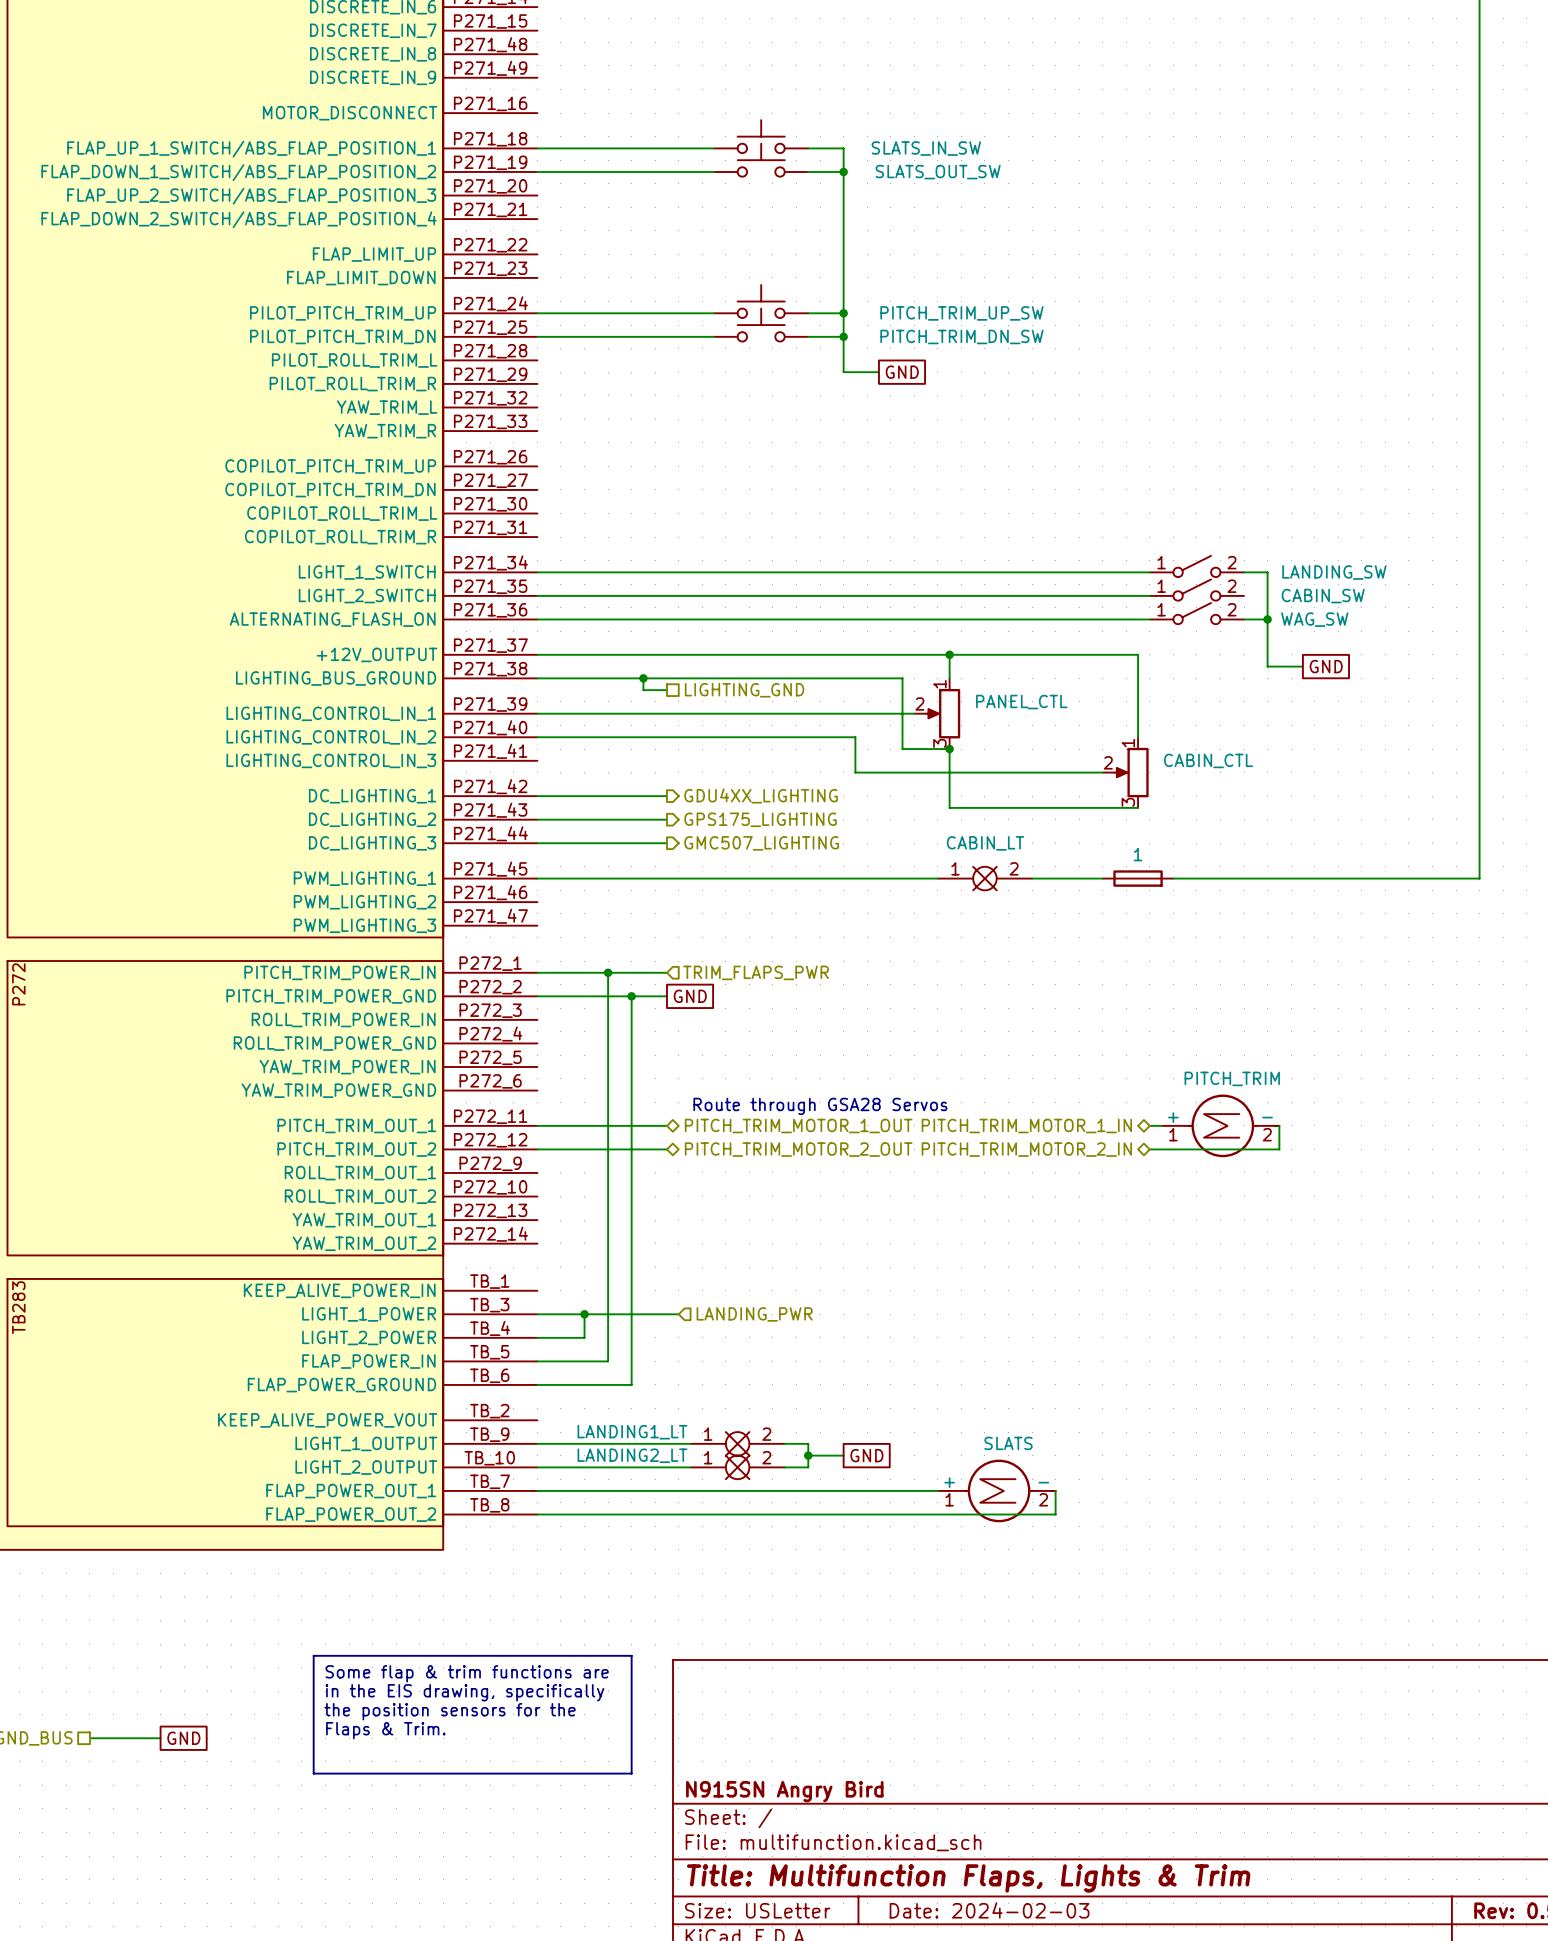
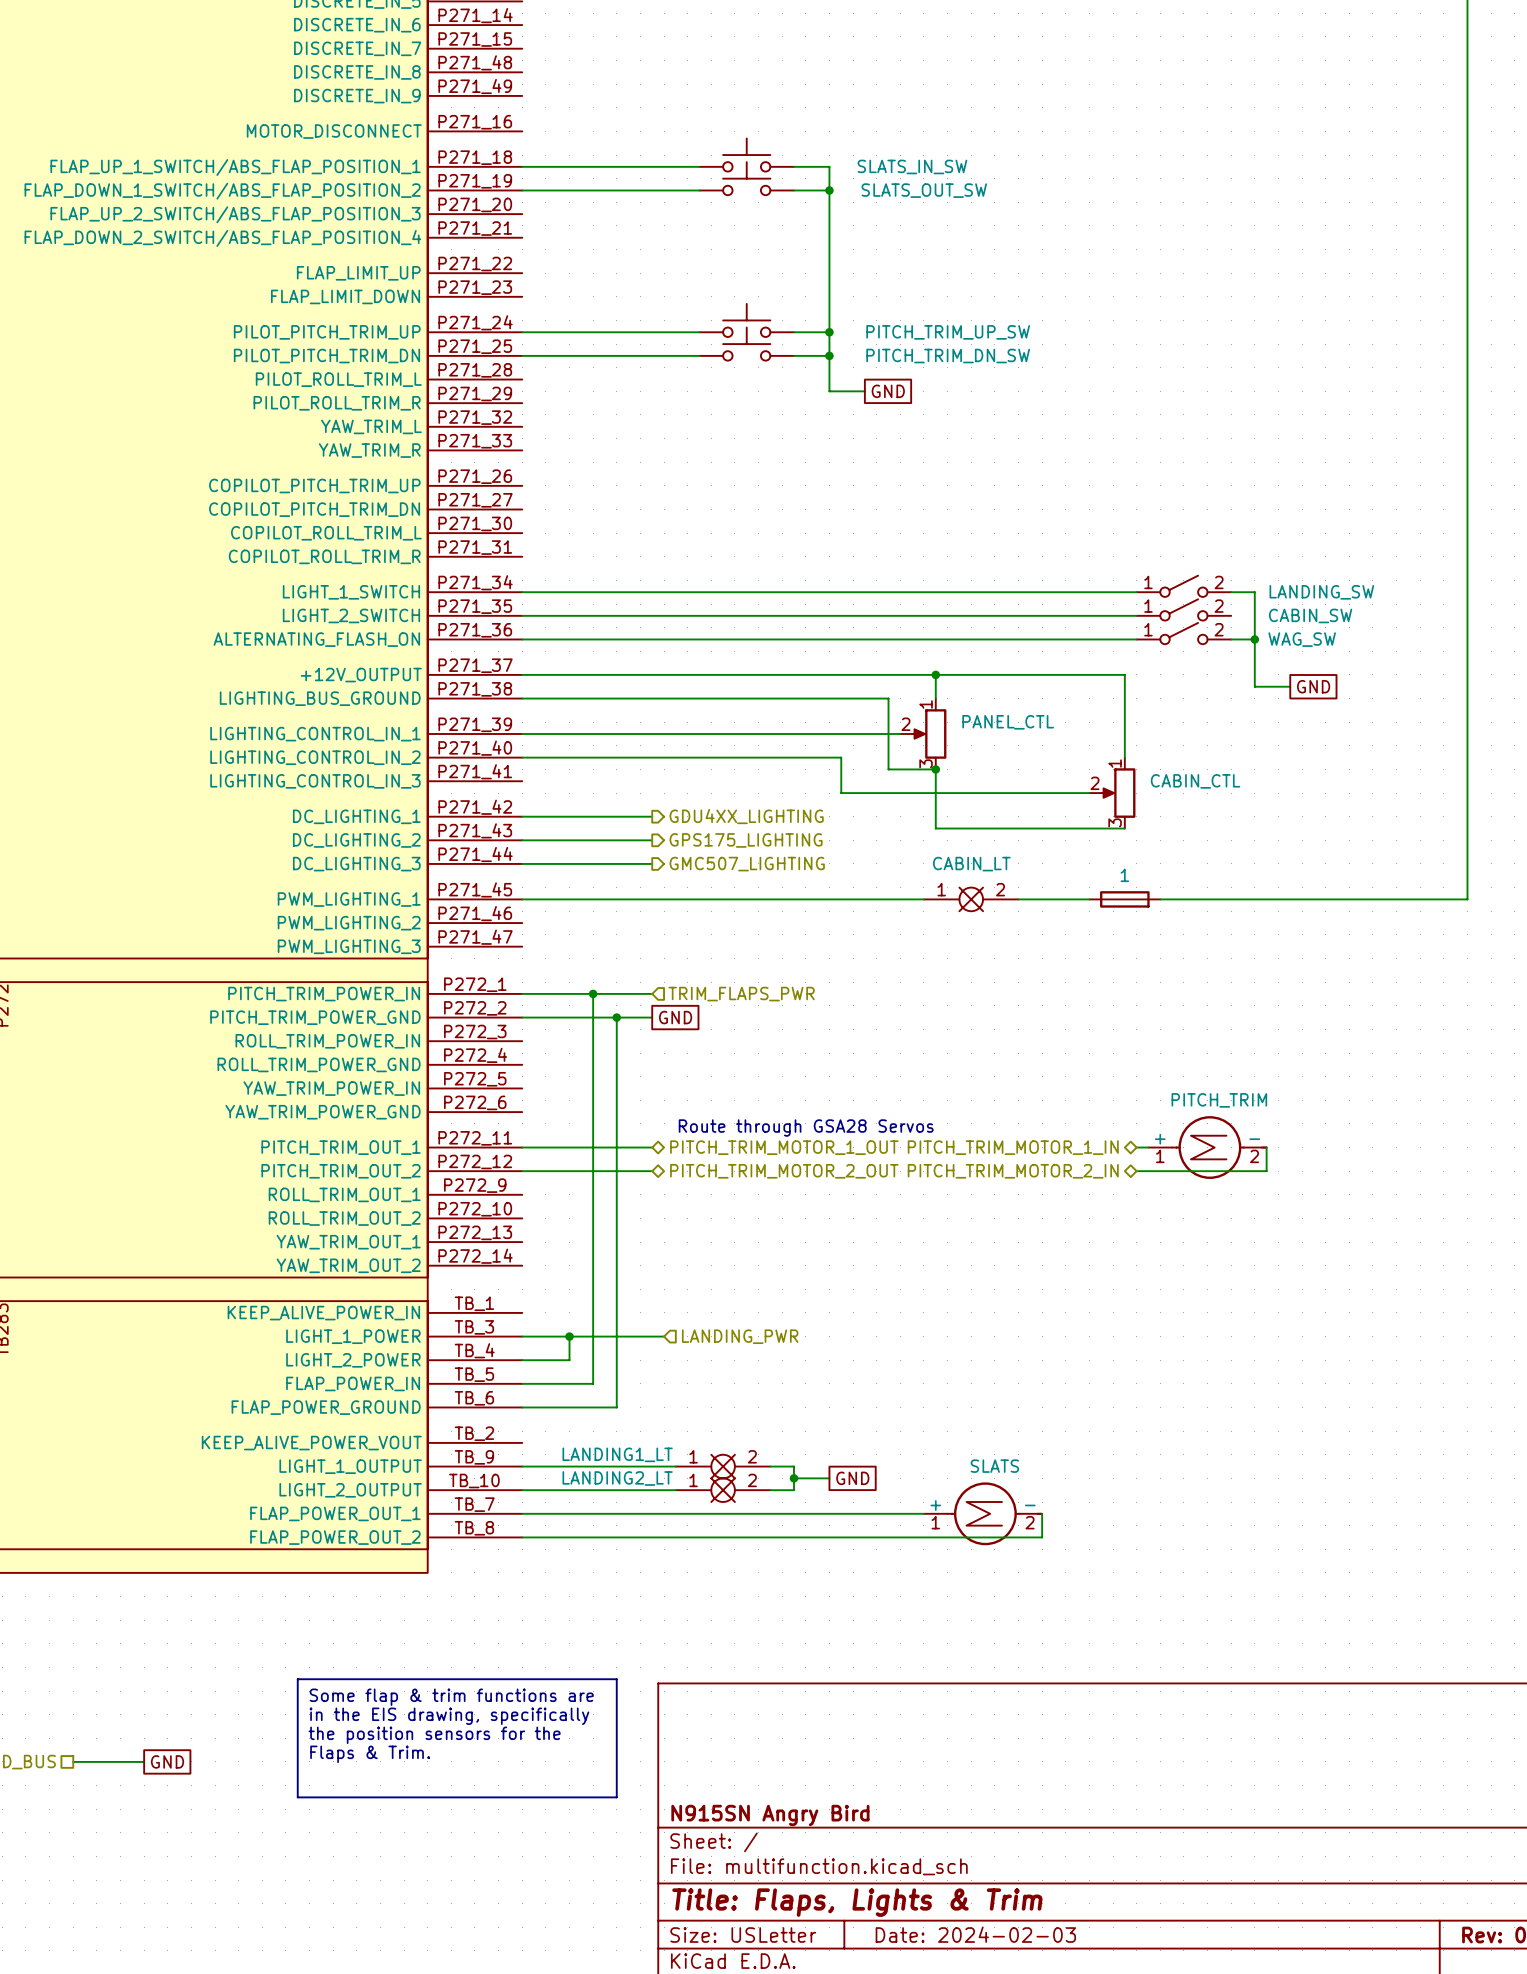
wire: (643, 678) (643, 690) (666, 690) -> none
junction: (643, 678) -> none
hierarchical label: LIGHTING_GND (744, 690) -> none
title block: Title: Multifunction Flaps, Lights & Trim (968, 1878) -> Title: Flaps, Lights & Trim (857, 1902)

